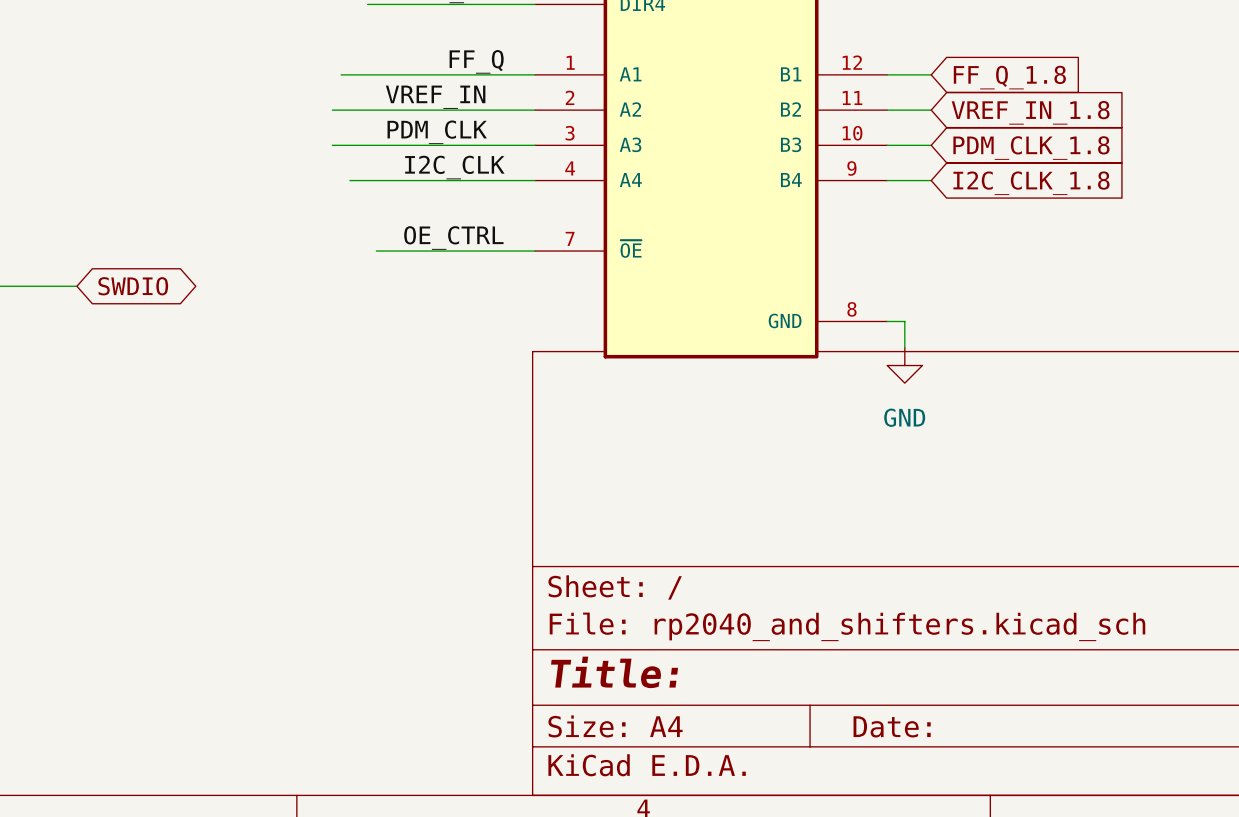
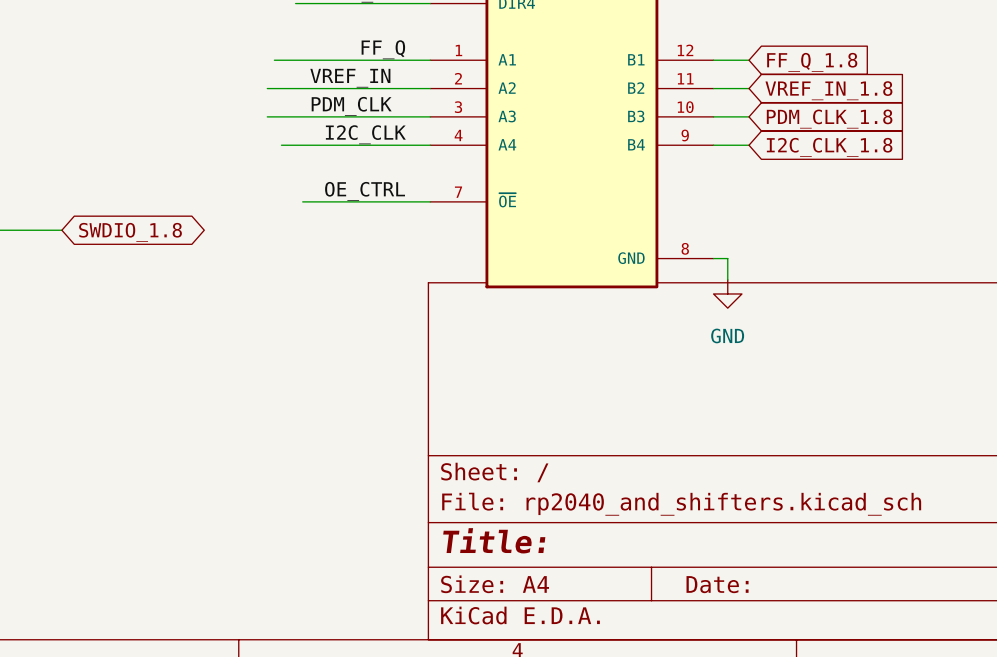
global label: SWDIO (133, 286) -> SWDIO_1.8 (130, 232)

